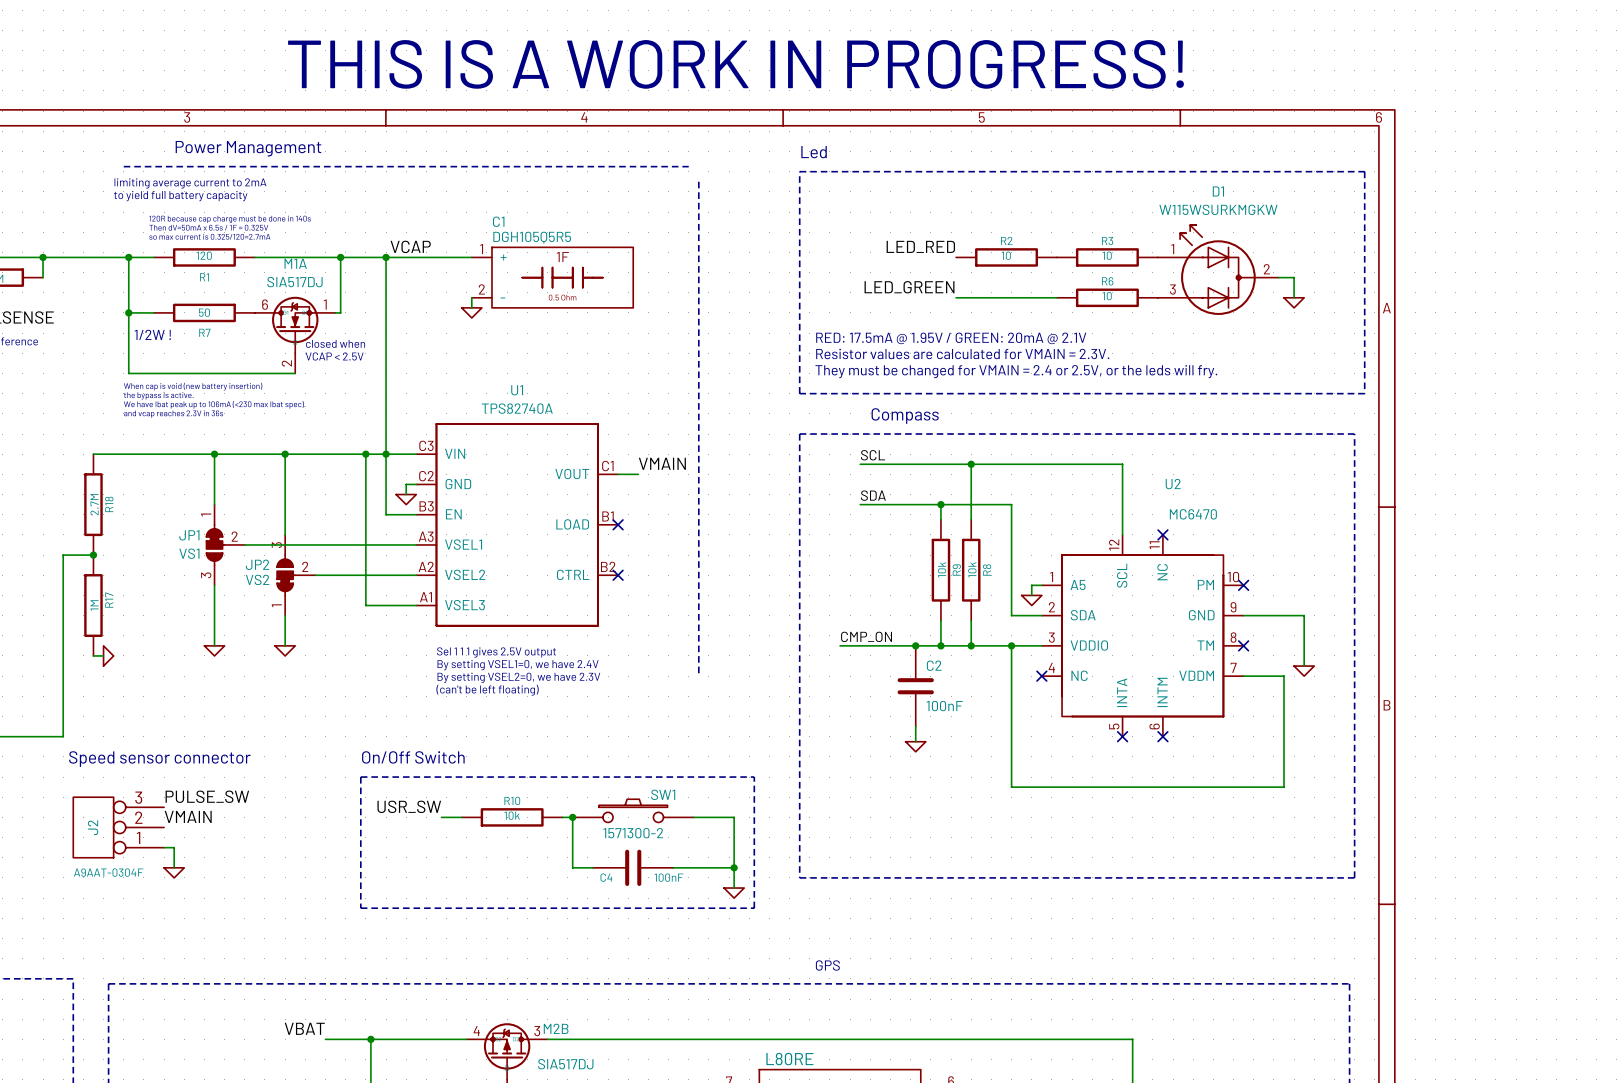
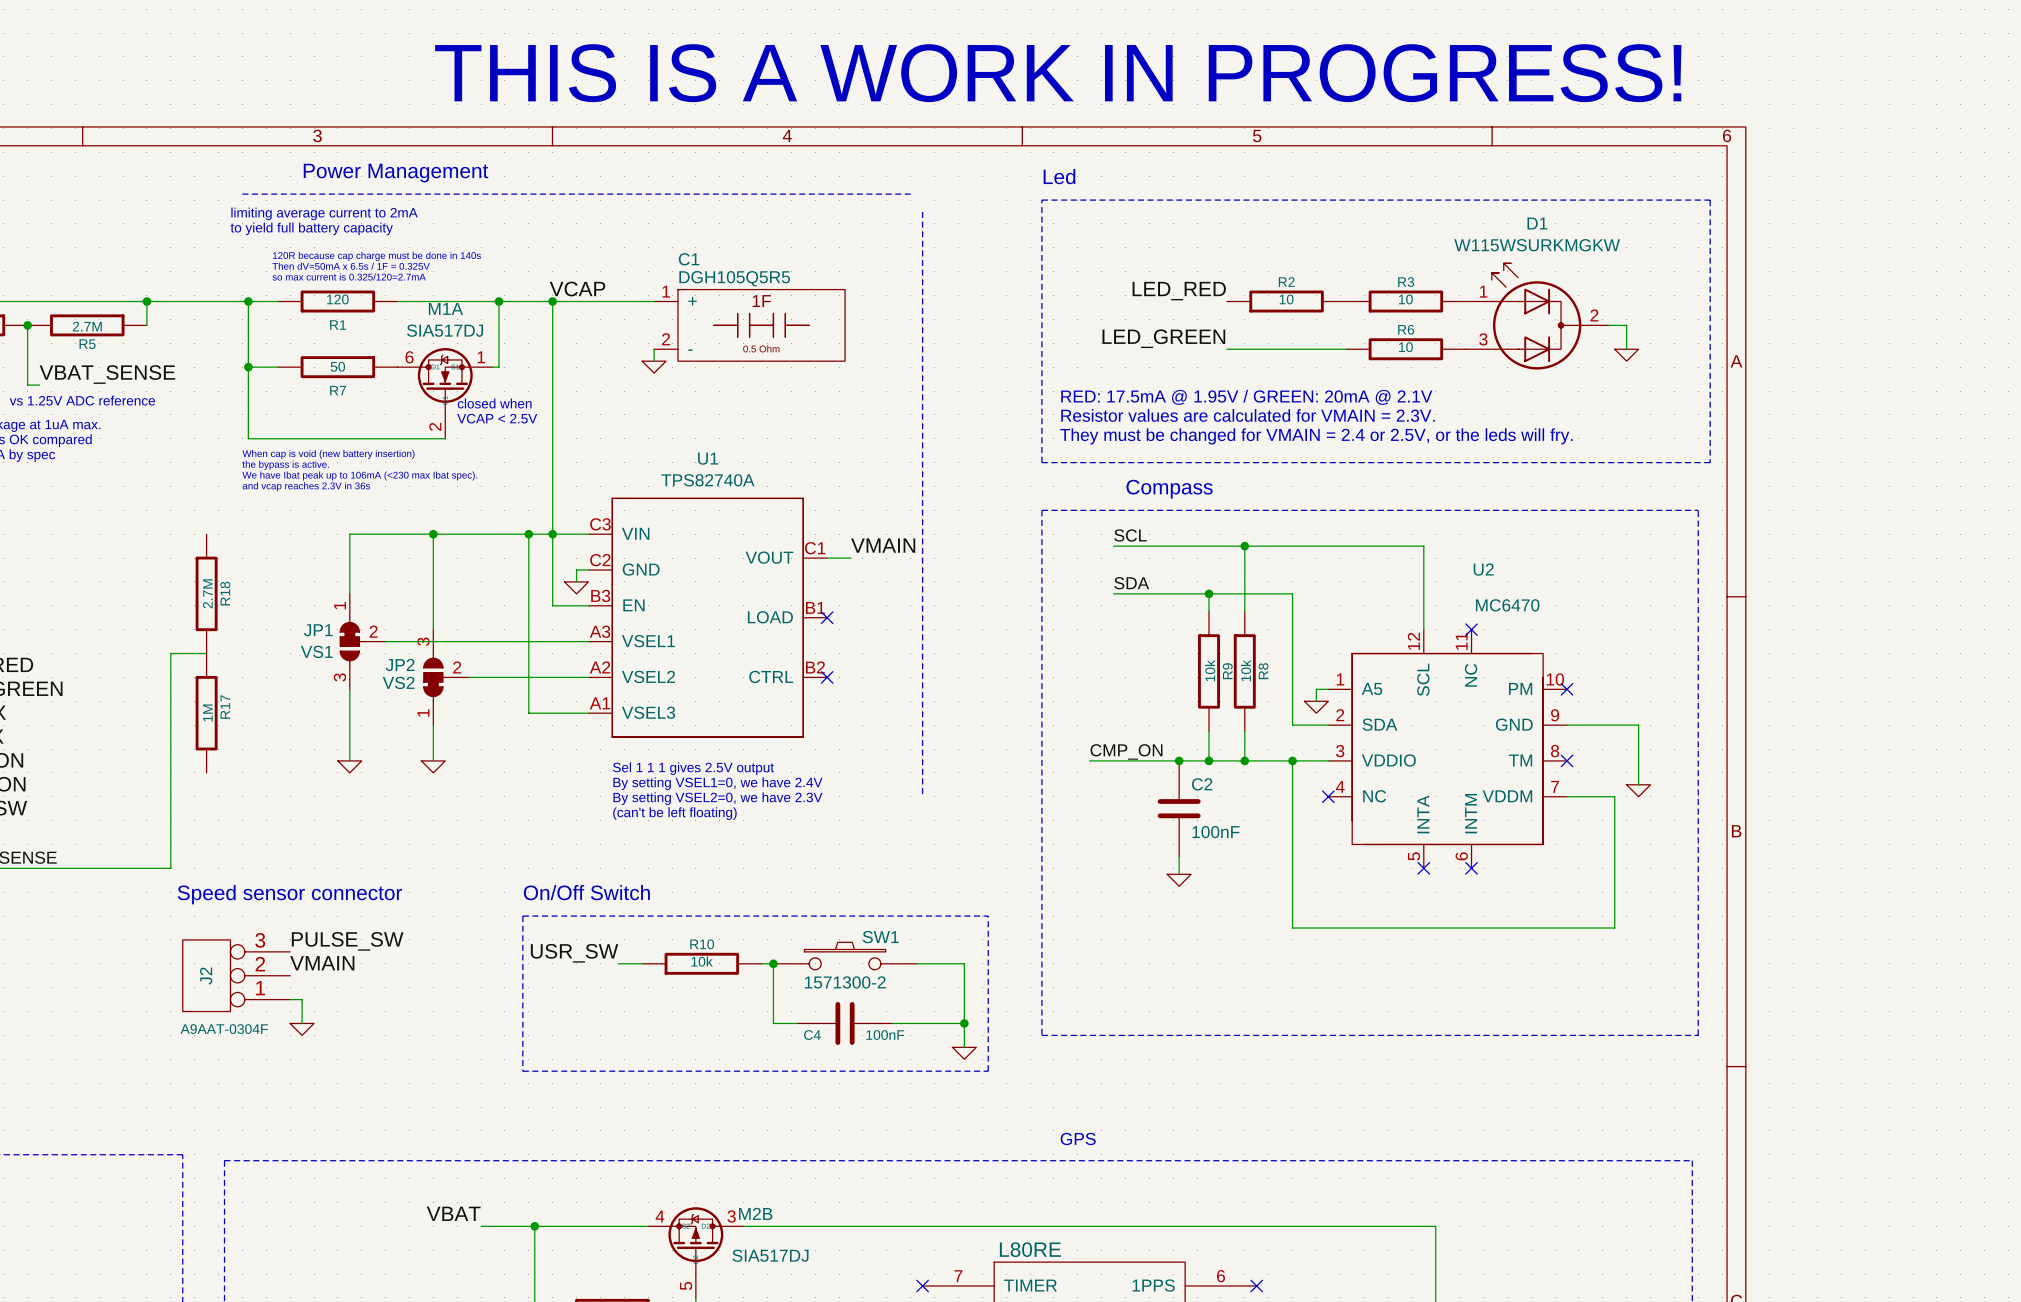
text: 1/2W ! (152, 334) -> none
wire: (93, 454) (214, 454) -> none
junction: (214, 454) -> none
junction: (93, 555) -> none
wire: (93, 655) (103, 655) -> none
power symbol: (108, 655) -> none

